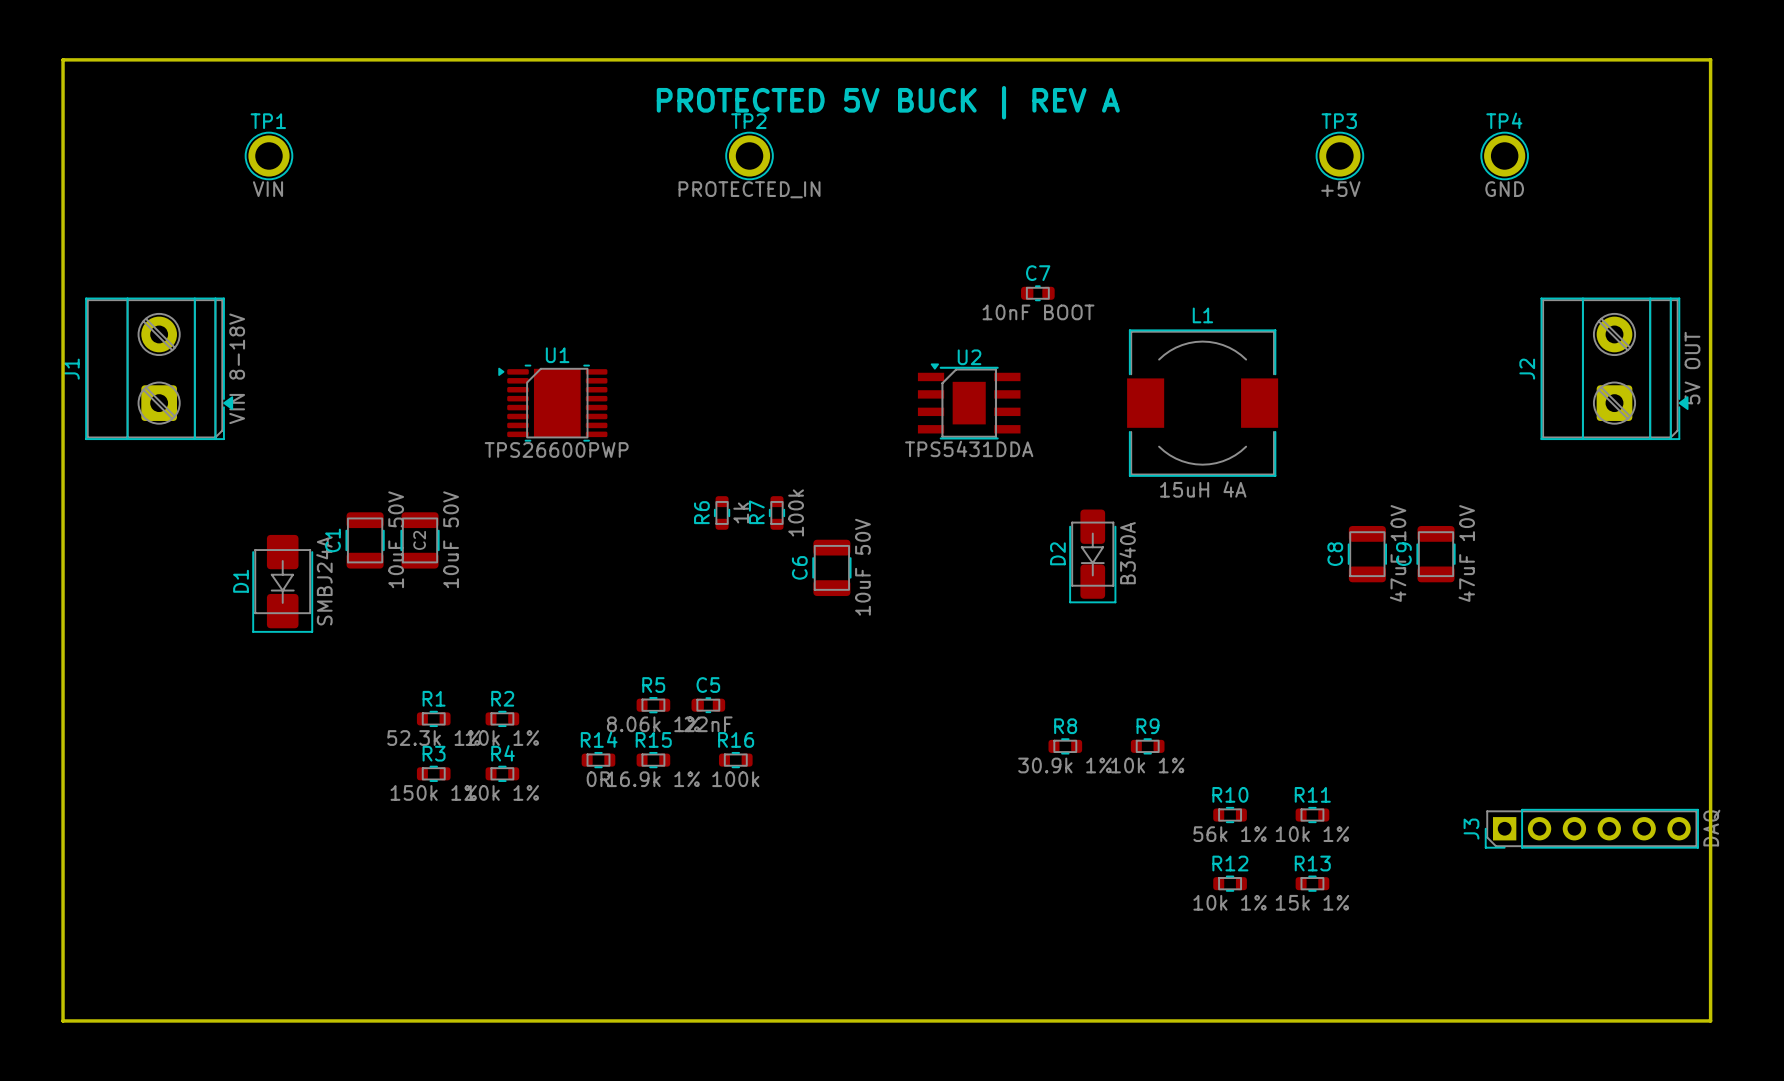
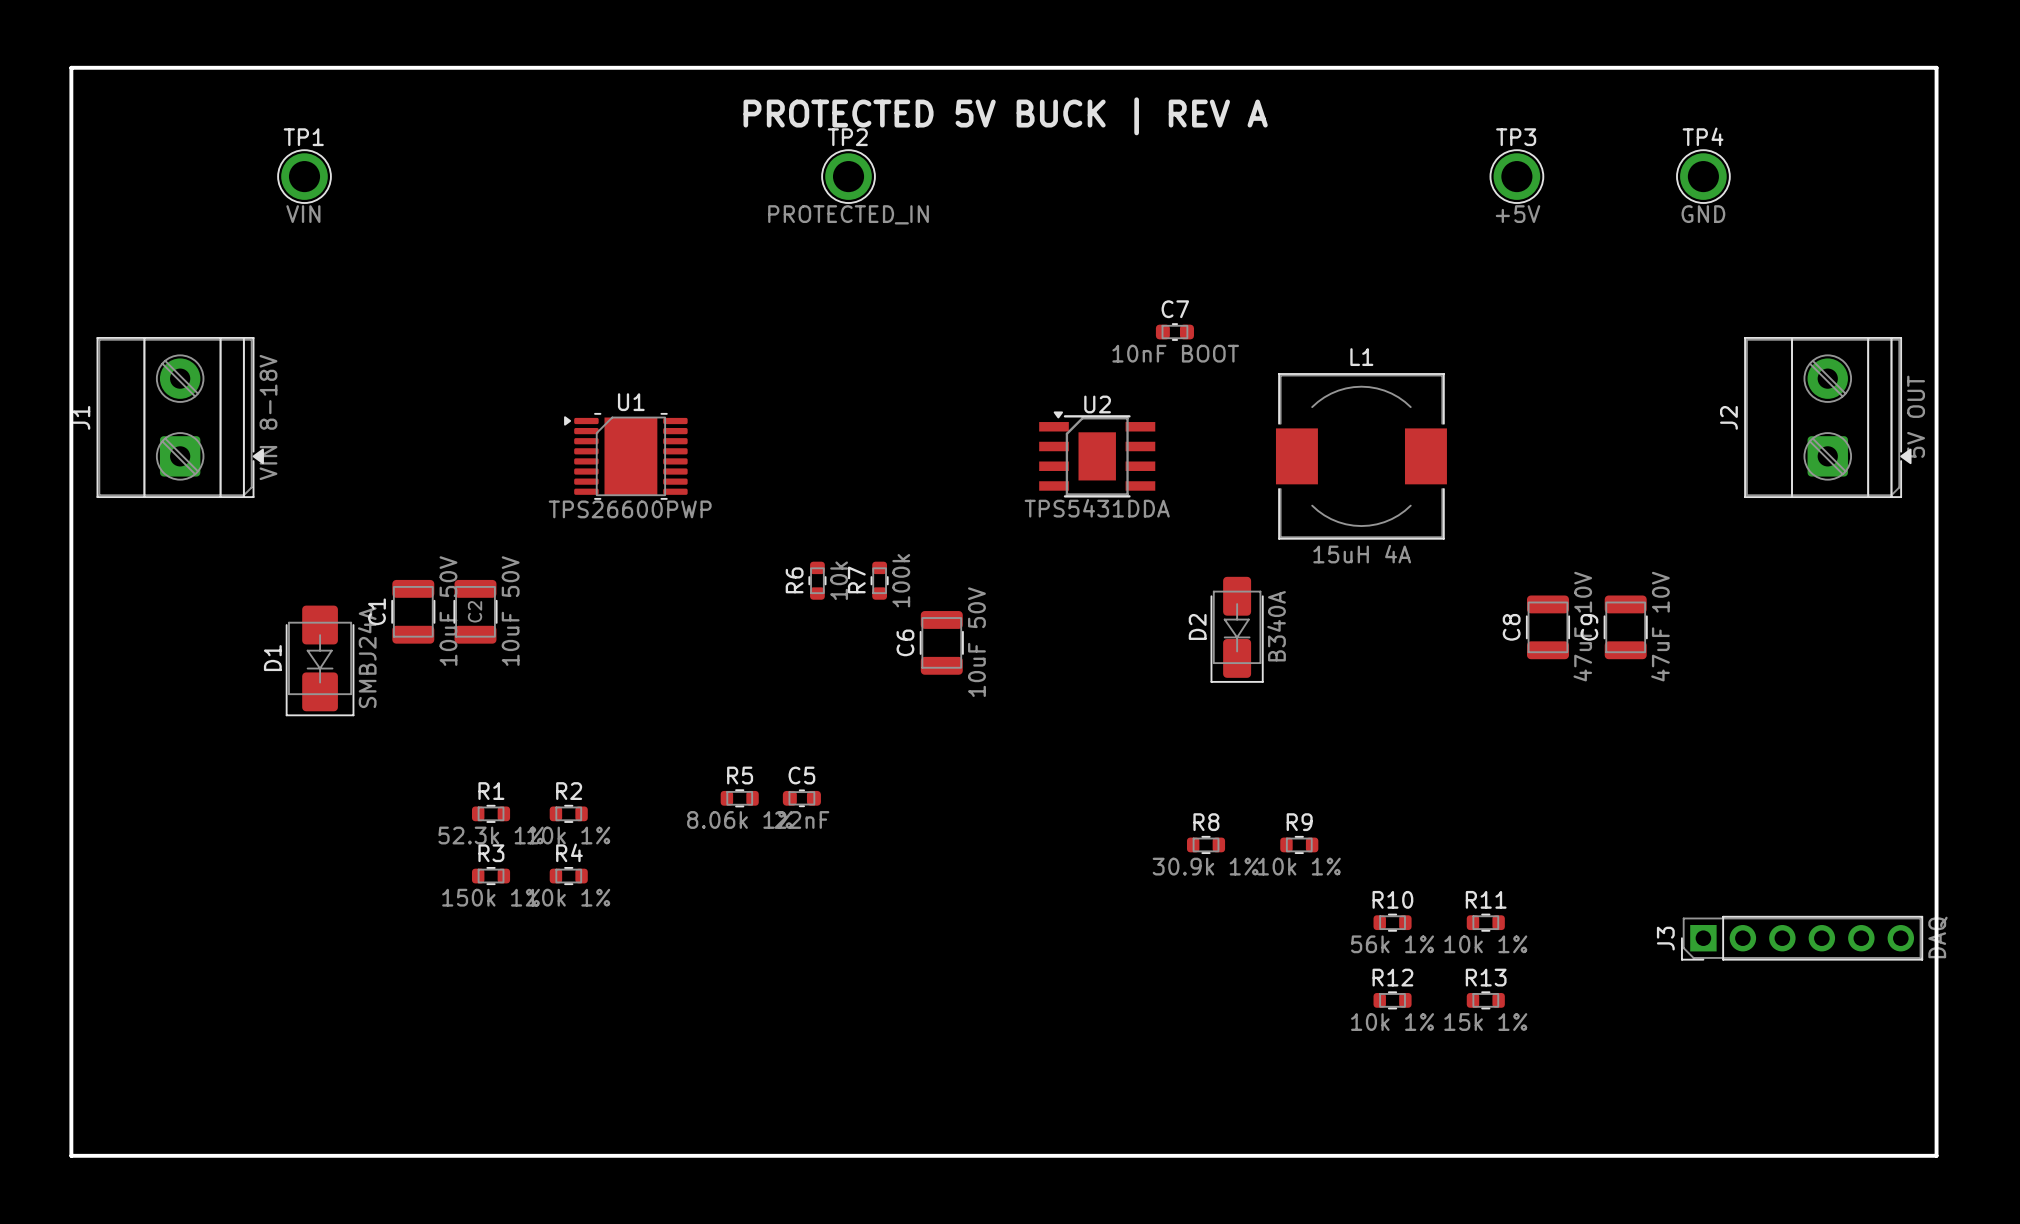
R6 value: 1k (741, 512) -> 10k (839, 580)
R14: 0R (598, 760) -> none
R15: 16.9k 1% (653, 760) -> none
R16: 100k (735, 760) -> none

